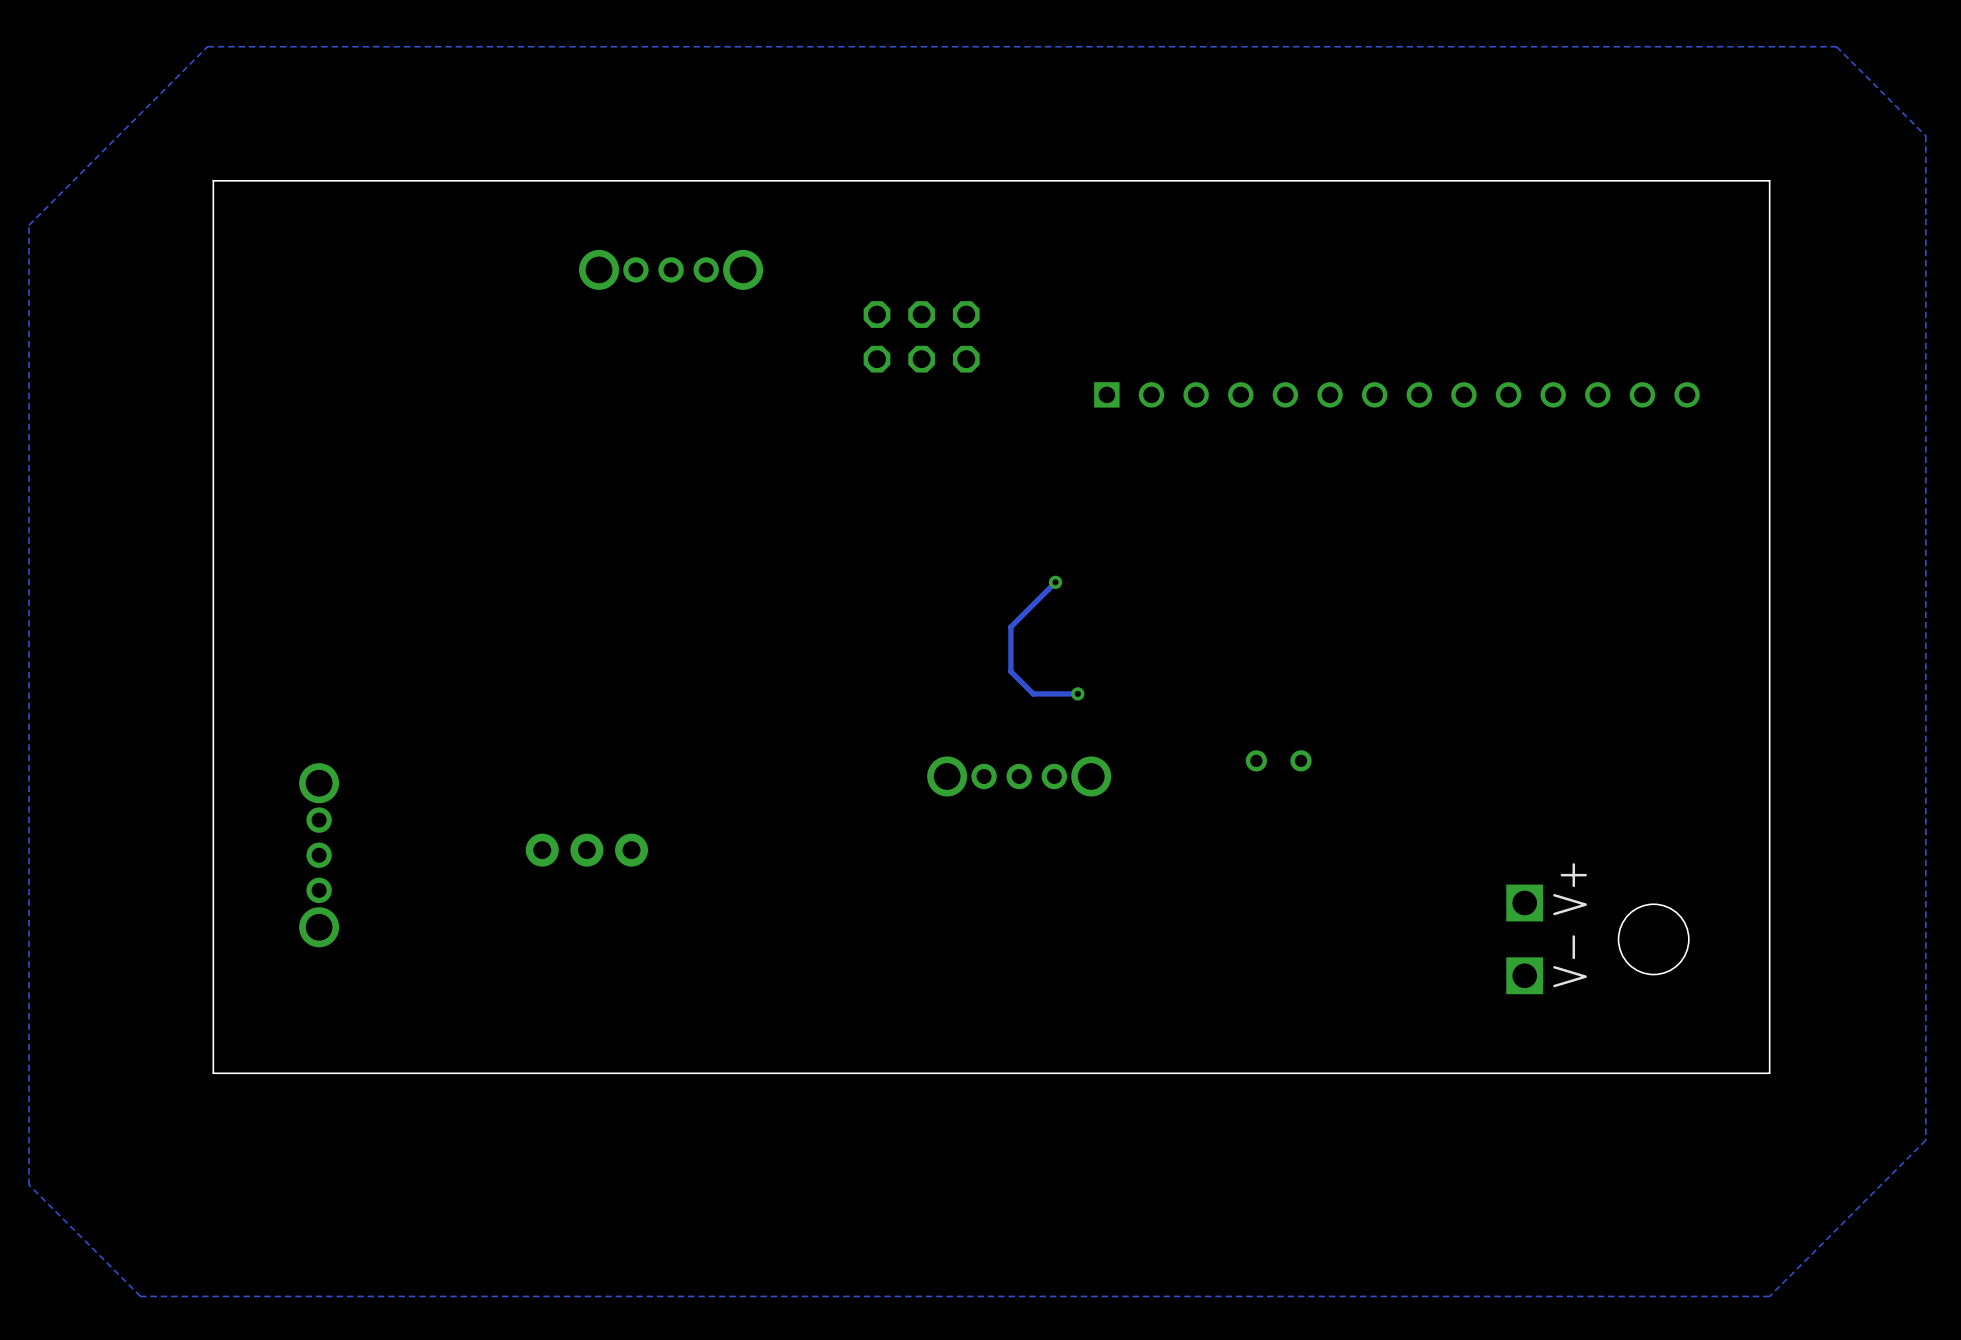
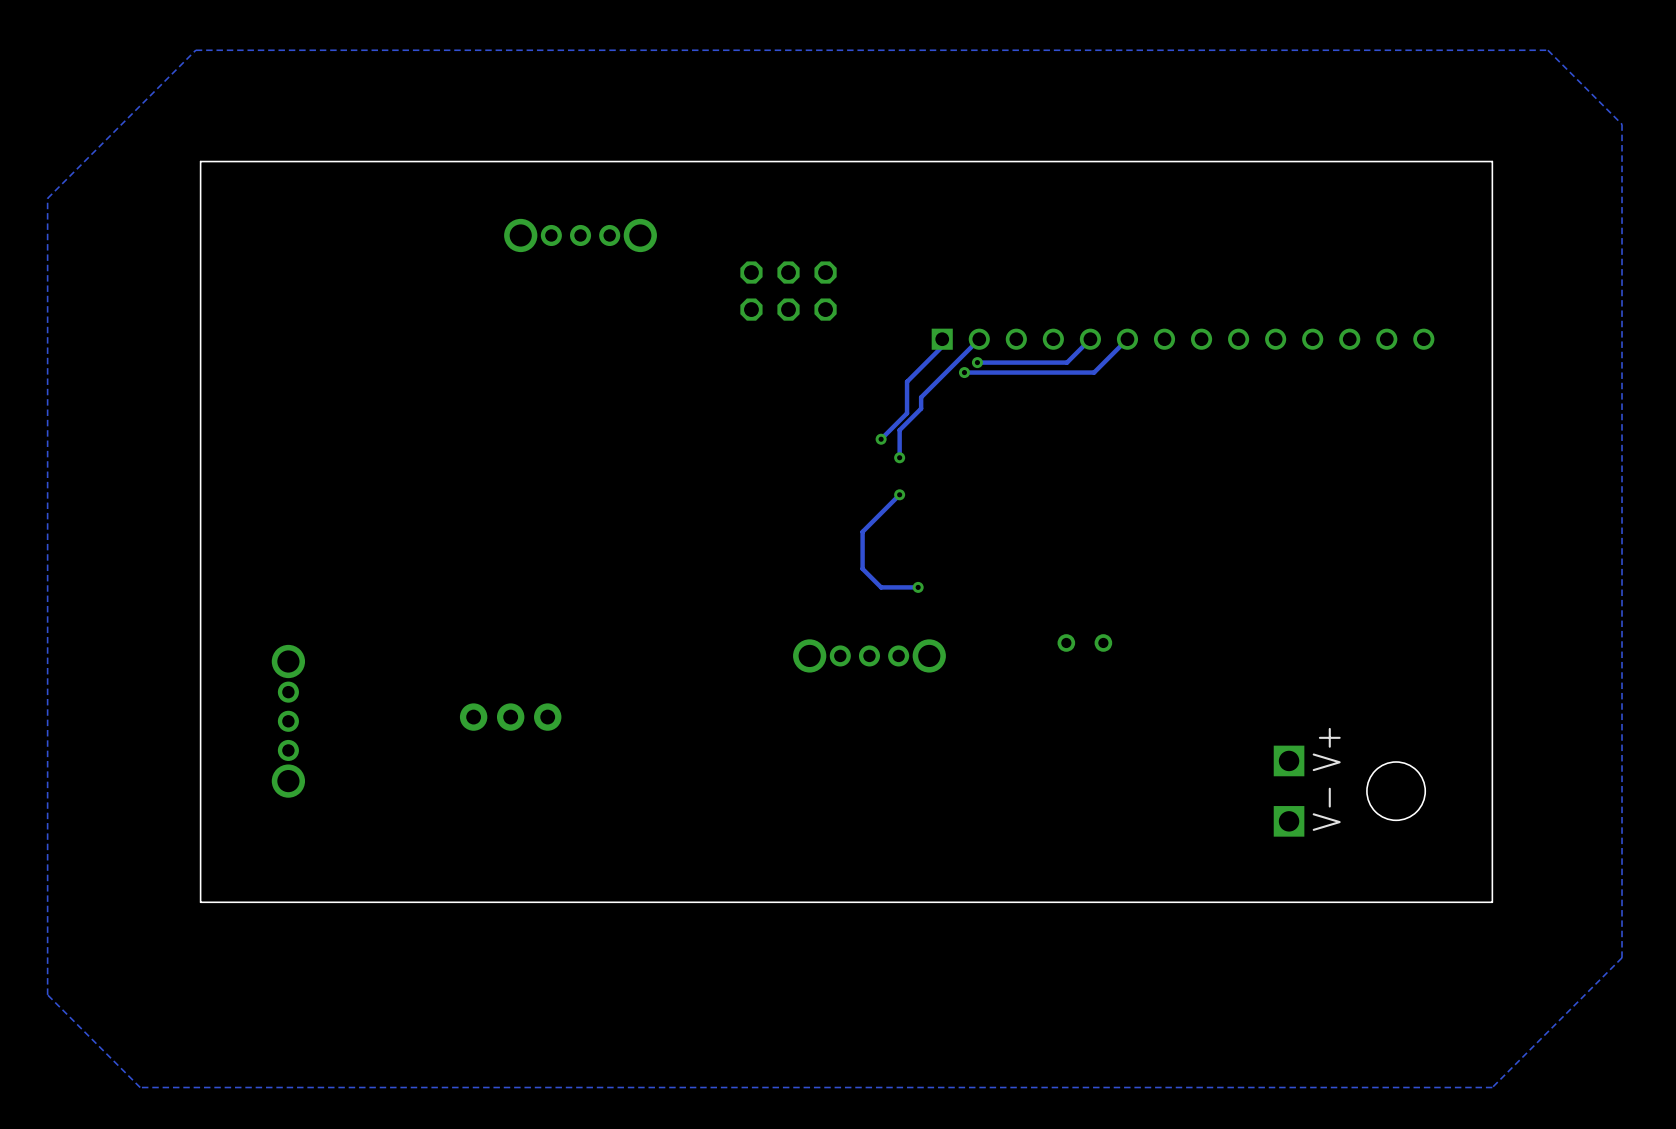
track: none -> (942, 339) (942, 346) (907, 381) (907, 413) (881, 439)
track: none -> (979, 339) (921, 397) (921, 408) (899, 430) (899, 457)
track: none -> (1090, 339) (1067, 362) (977, 362)
track: none -> (1127, 339) (1094, 372) (964, 372)
via: none -> (977, 362)
via: none -> (964, 372)
via: none -> (881, 439)
via: none -> (899, 457)

